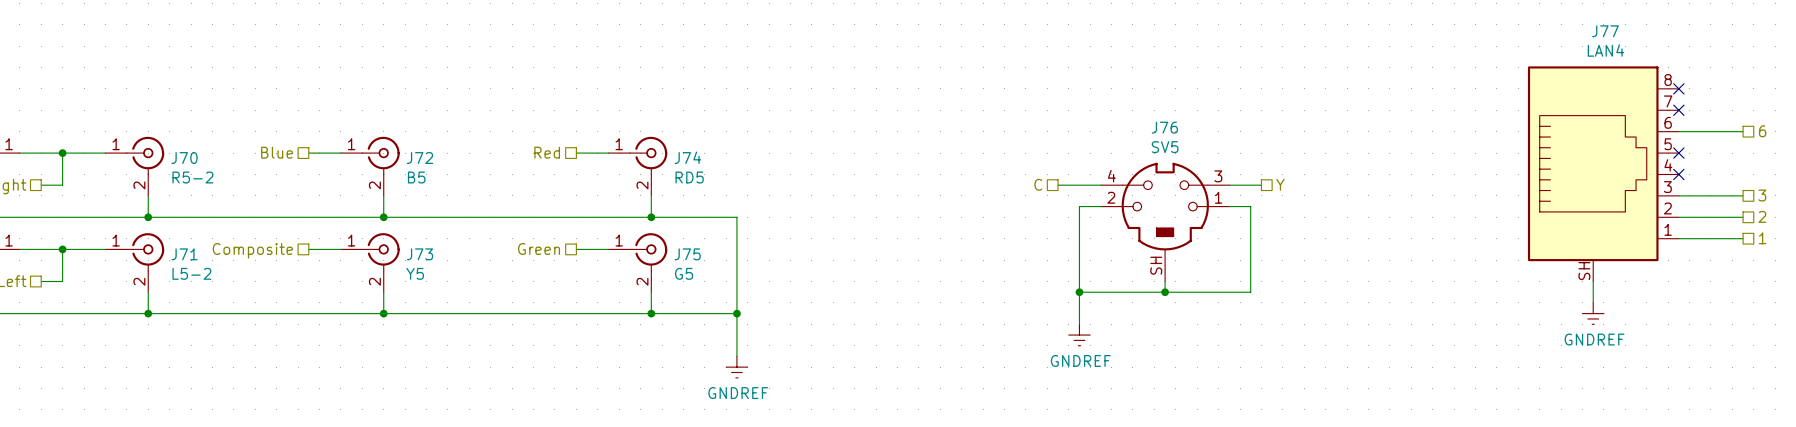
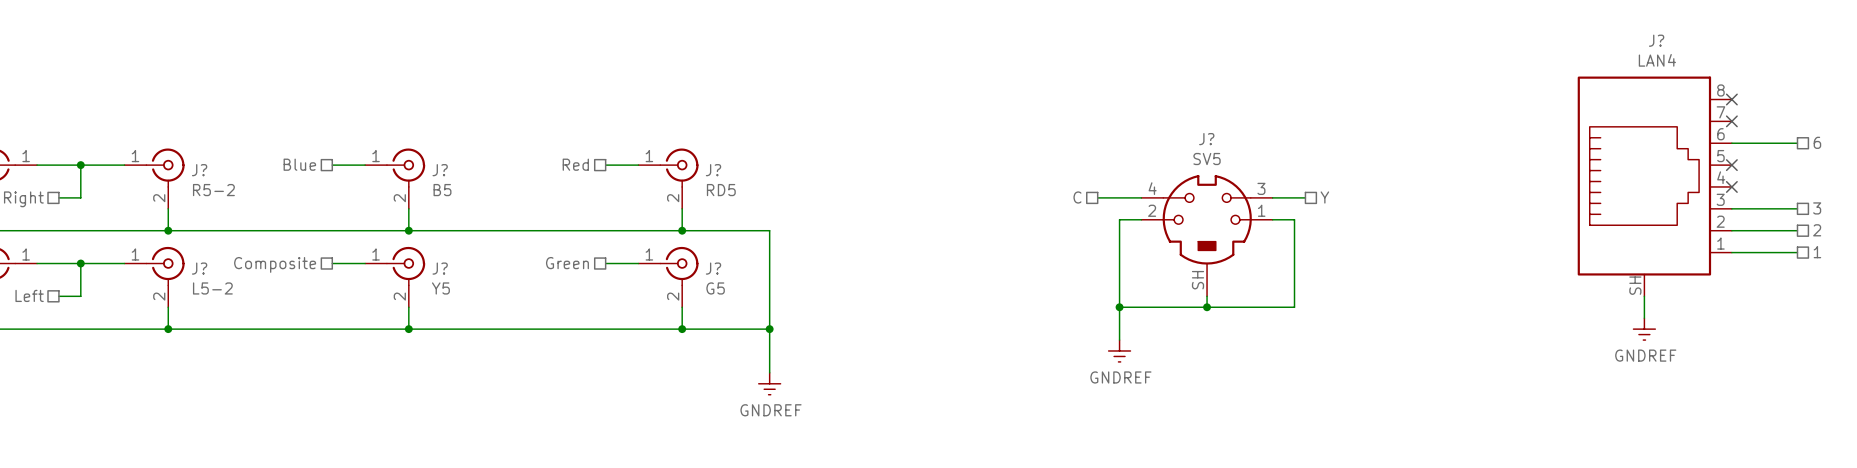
J77 name: J77 (1605, 31) -> J? (1656, 40)
J76 name: J76 (1164, 127) -> J? (1206, 139)
J74 name: J74 (687, 157) -> J? (713, 170)
J70 name: J70 (184, 158) -> J? (199, 170)
J72 name: J72 (419, 158) -> J? (440, 170)
J71 name: J71 (184, 254) -> J? (199, 268)
J73 name: J73 (419, 254) -> J? (440, 268)
J75 name: J75 (687, 254) -> J? (713, 268)

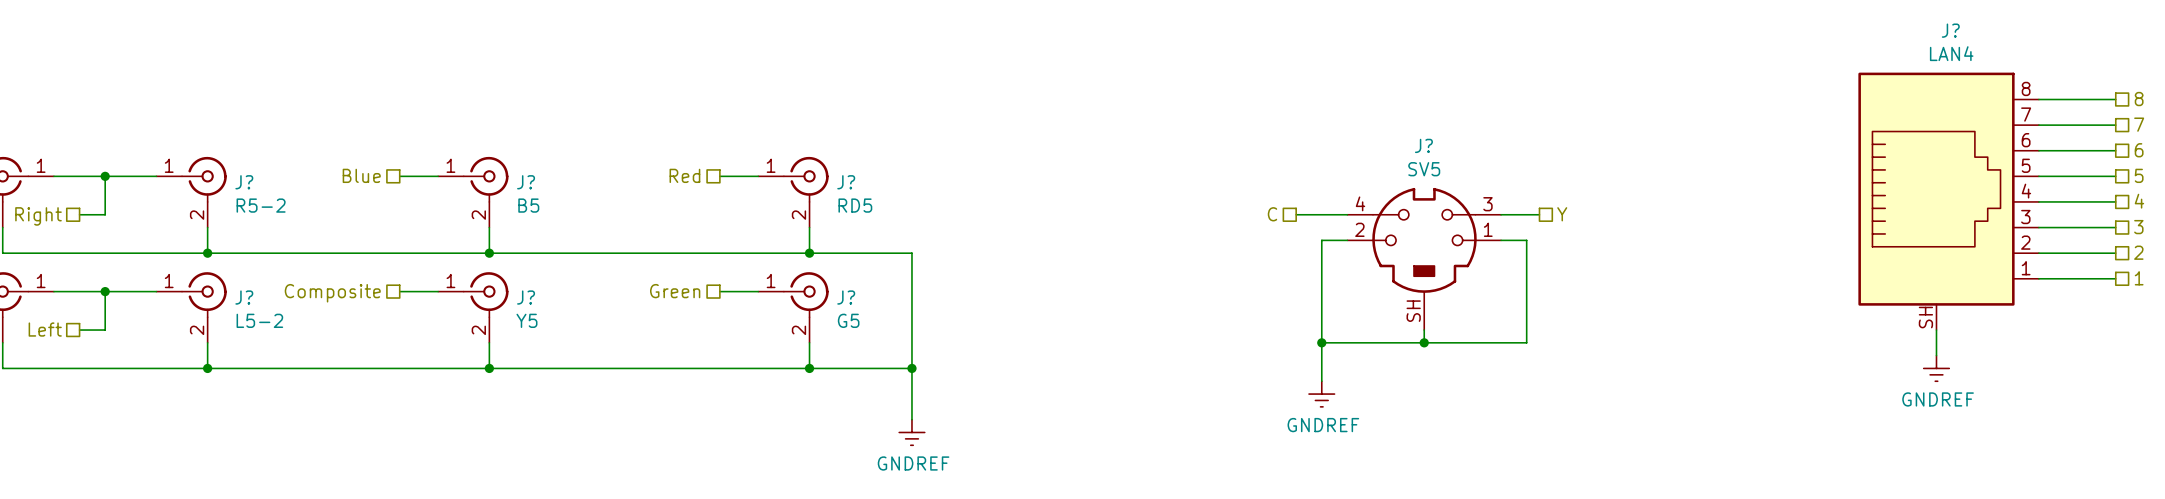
wire: none -> (2038, 99) (2115, 99)
no-connect mark: (1731, 99) -> none
hierarchical label: none -> 8 (2139, 99)
hierarchical label: none -> 7 (2139, 124)
wire: none -> (2038, 125) (2115, 125)
no-connect mark: (1731, 121) -> none
hierarchical label: none -> 5 (2139, 175)
wire: none -> (2038, 176) (2115, 176)
no-connect mark: (1731, 165) -> none
wire: none -> (2038, 201) (2115, 201)
no-connect mark: (1731, 186) -> none
hierarchical label: none -> 4 (2139, 201)

